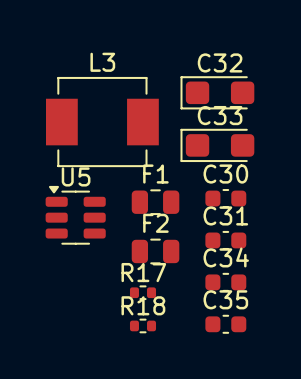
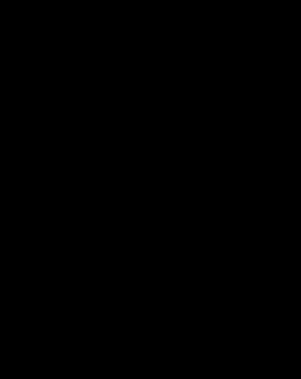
C32: (217, 92) -> none
L3: (102, 122) -> none
C33: (217, 145) -> none
C30: (225, 198) -> none
F1: (155, 202) -> none
U5: (75, 215) -> none
C31: (225, 240) -> none
F2: (155, 251) -> none
C34: (225, 282) -> none
R17: (142, 292) -> none
C35: (225, 324) -> none
R18: (142, 325) -> none

